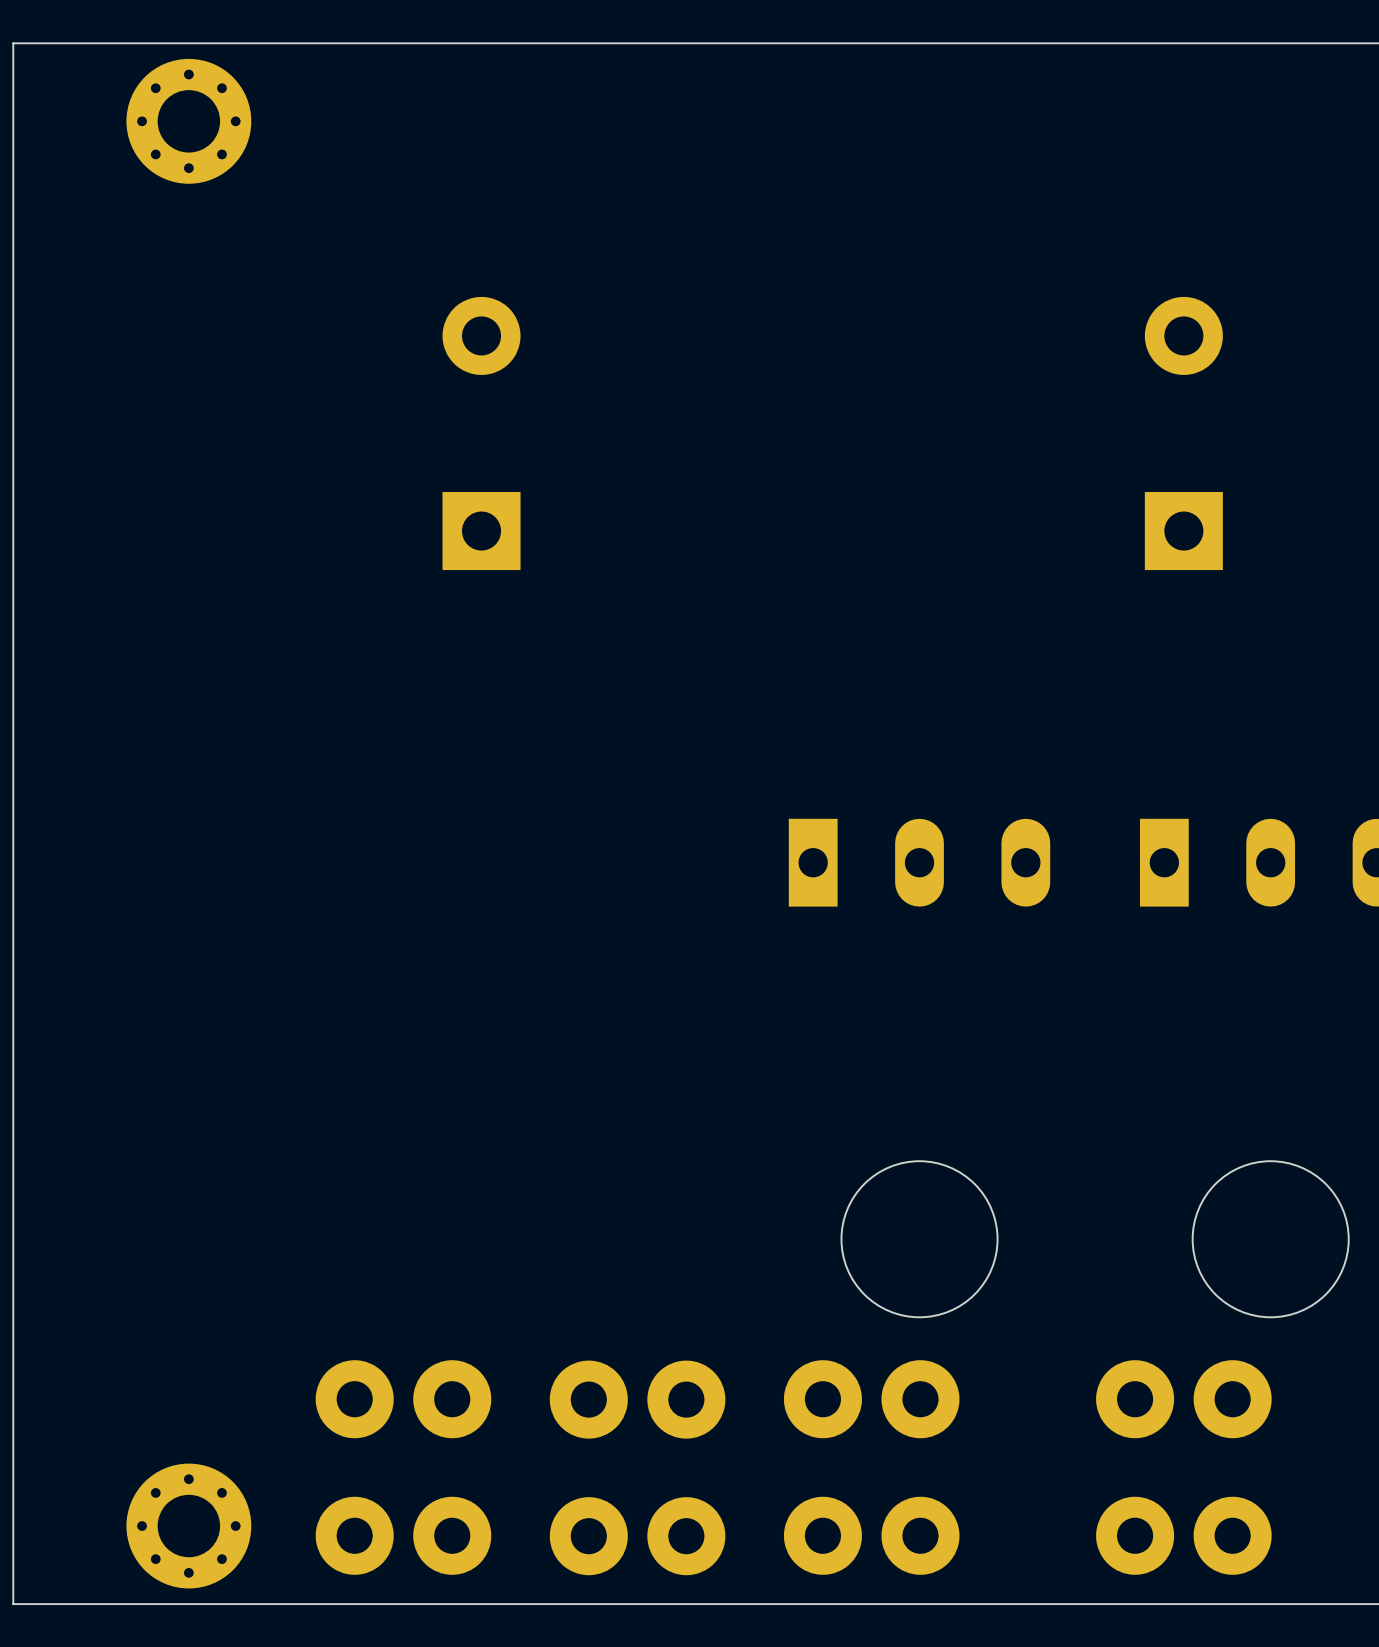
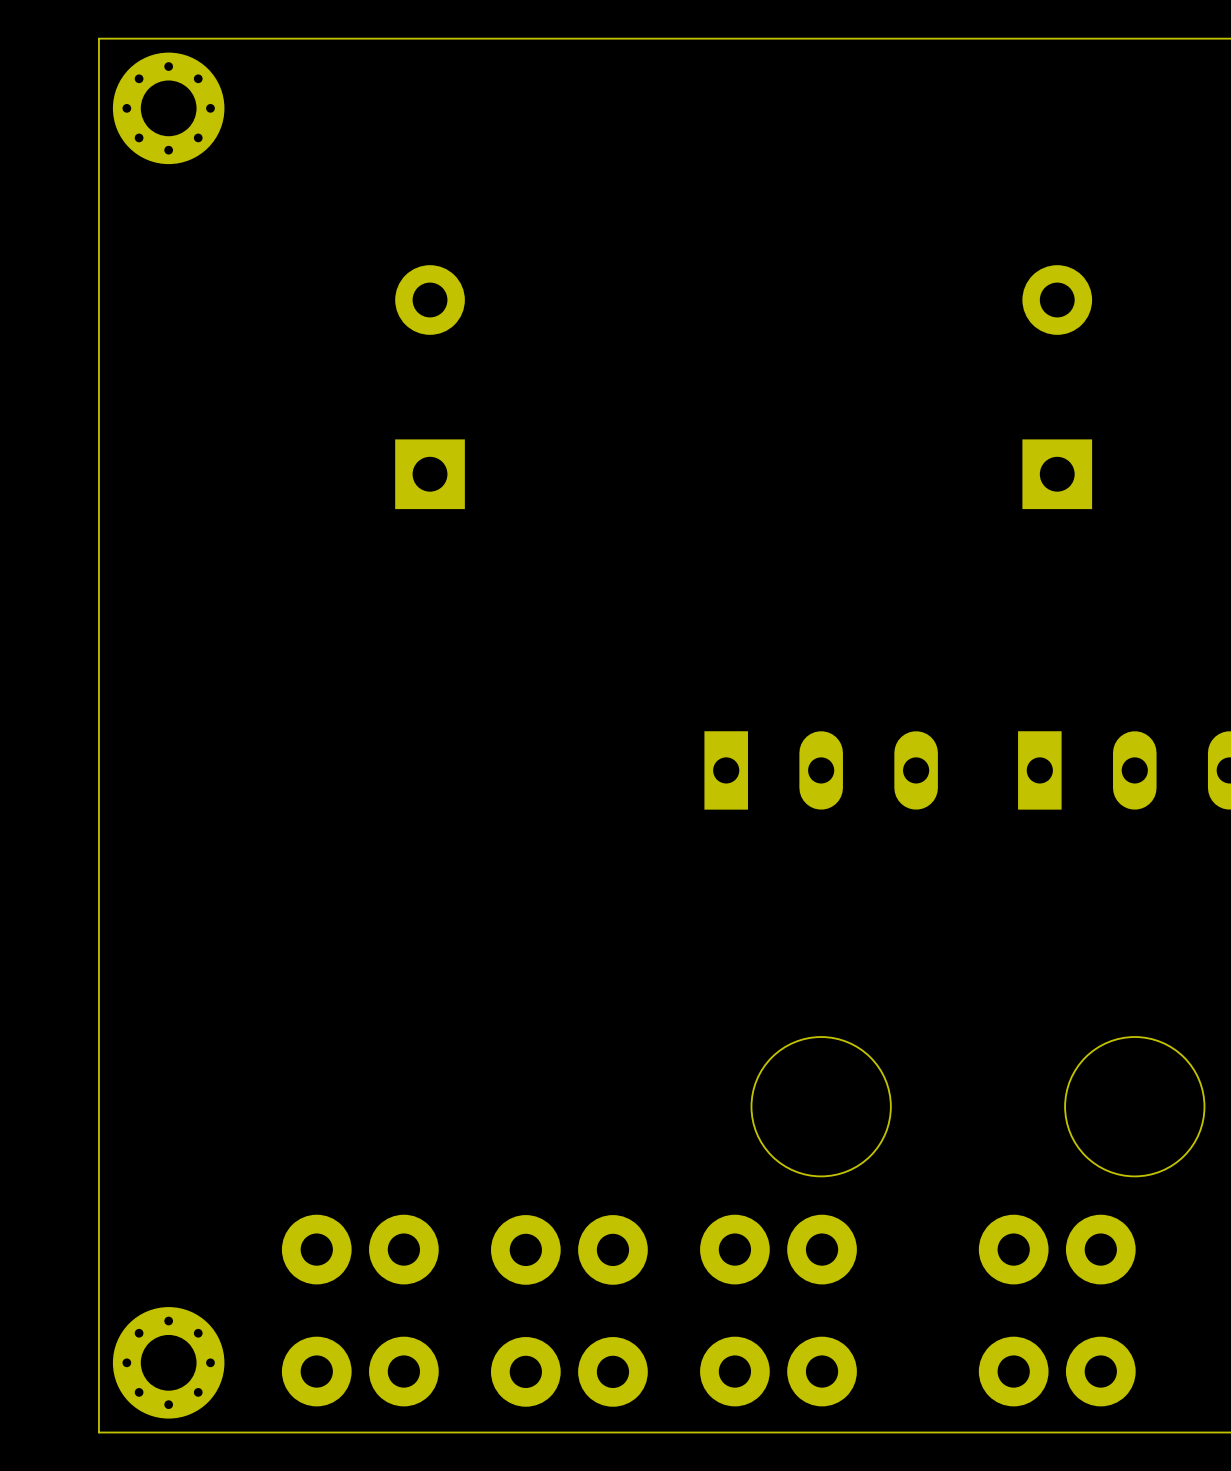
board edge: (110, 43) (13, 43) (13, 1604) (110, 1604) -> (98, 38) (98, 1432)

